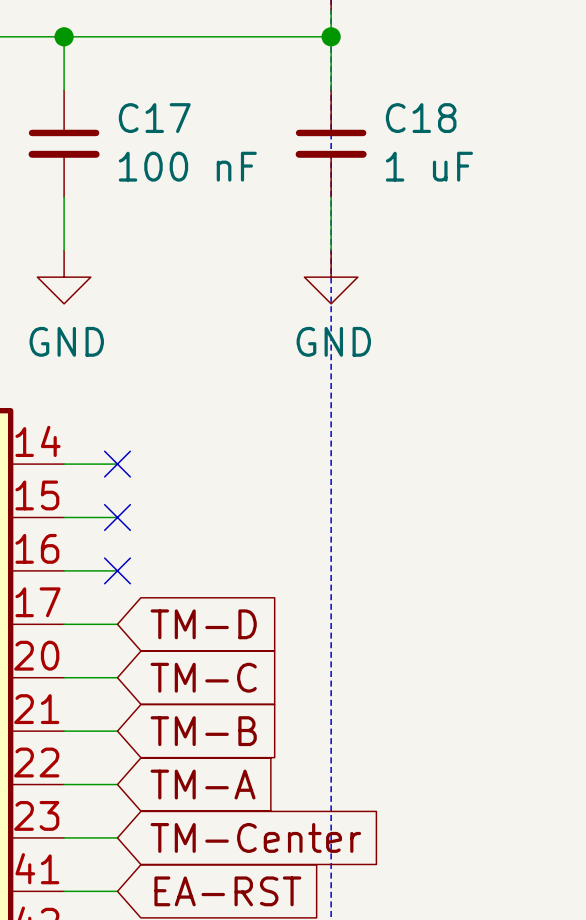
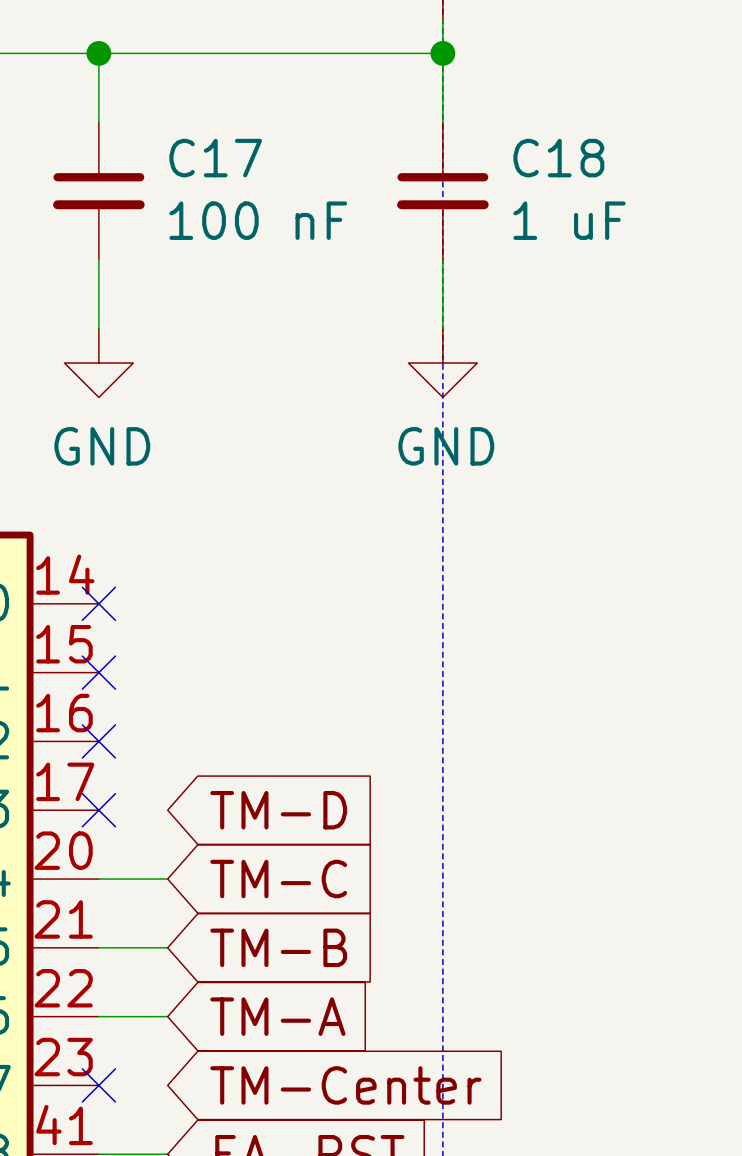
wire: (64, 464) (117, 464) -> none
no-connect mark: none -> (98, 603)
no-connect mark: (117, 464) -> none
wire: (64, 517) (117, 517) -> none
no-connect mark: none -> (98, 672)
no-connect mark: (117, 517) -> none
wire: (64, 570) (117, 570) -> none
no-connect mark: none -> (98, 741)
no-connect mark: (117, 570) -> none
wire: (64, 624) (117, 624) -> none
no-connect mark: none -> (98, 810)
wire: (64, 837) (117, 837) -> none
no-connect mark: none -> (98, 1085)

